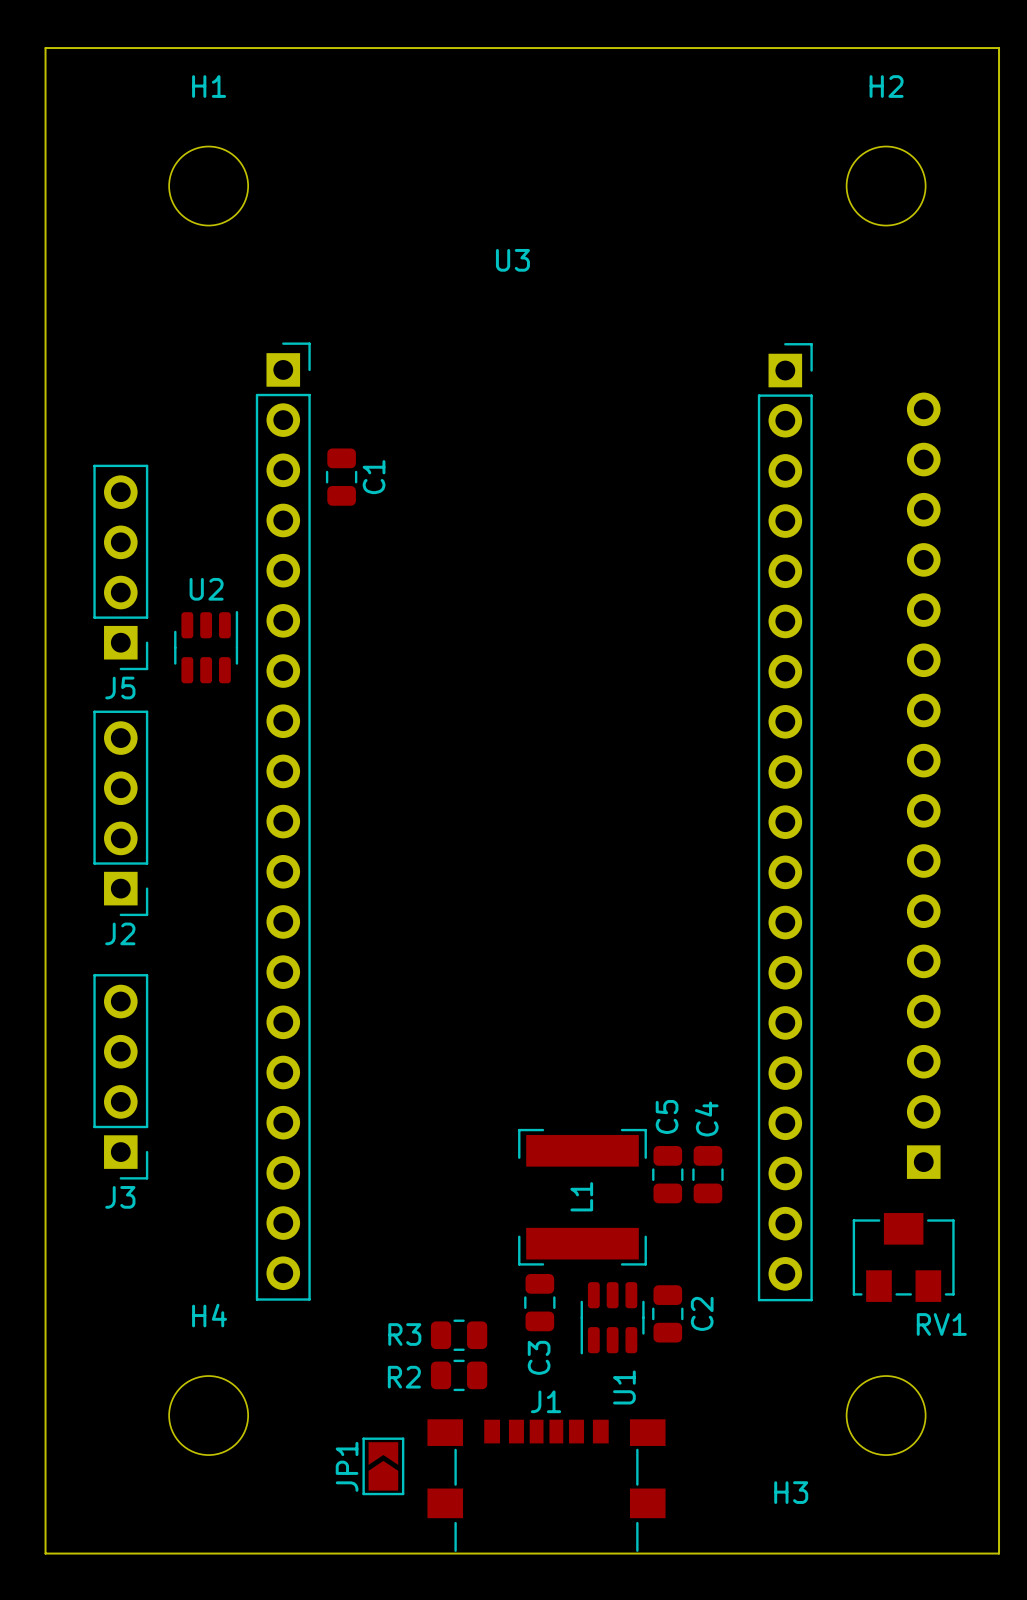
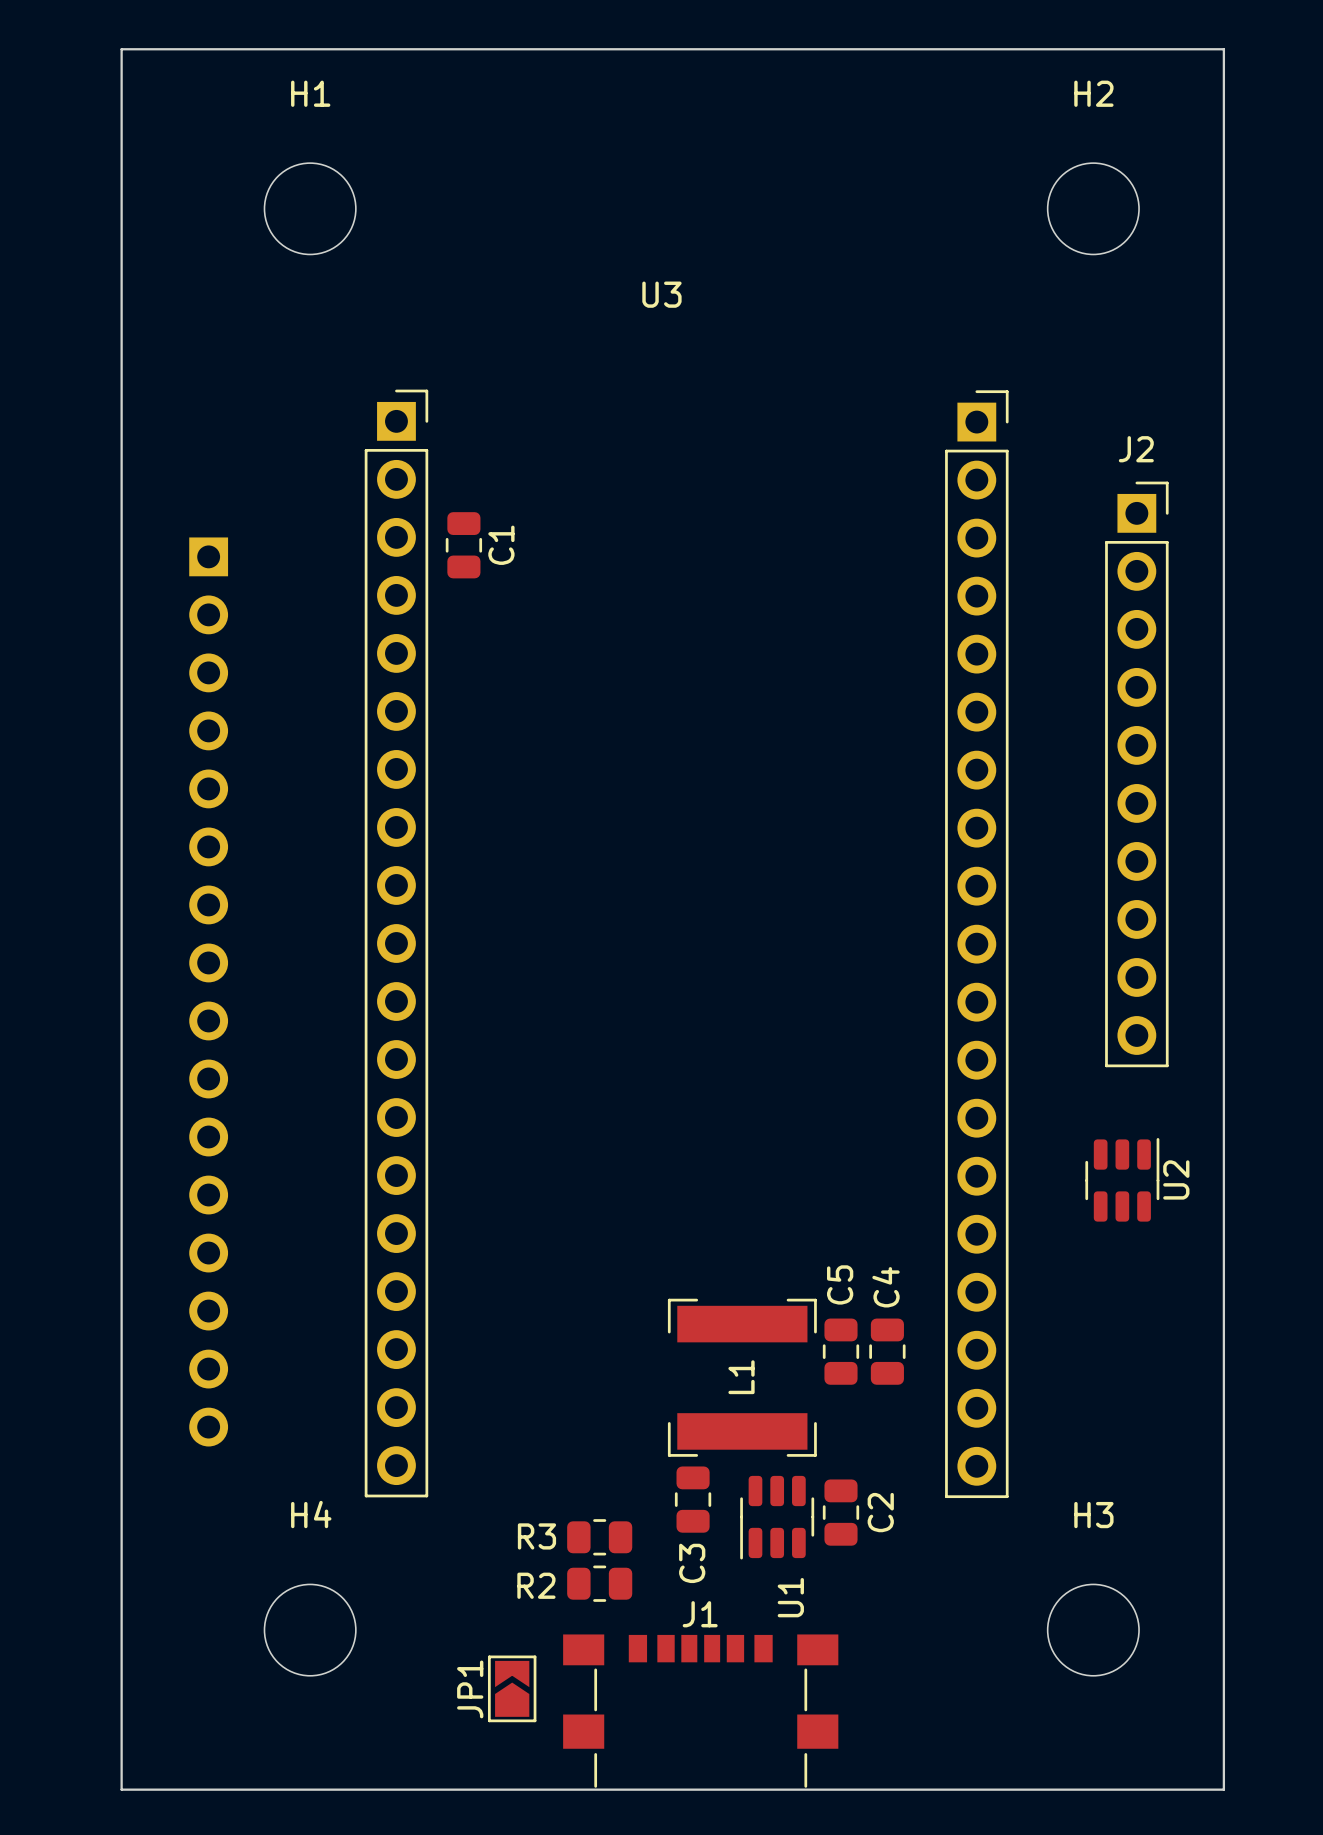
J5: (120, 567) -> none
U2 name rotation: 0° (206, 589) -> 90° counterclockwise (1176, 1179)
U2 name position: U2 (206, 589) -> U2 (1176, 1179)
U2 position: (206, 647) -> (1122, 1179)
J2 footprint: [93, 710, 149, 917] -> [1105, 481, 1169, 1068]
part: (923, 785) -> none
part: none -> (208, 991)
J2 name position: J2 (120, 933) -> J2 (1136, 449)
J3: (120, 1076) -> none
RV1: (903, 1257) -> none
H3 name position: H3 (791, 1492) -> H3 (1093, 1515)

